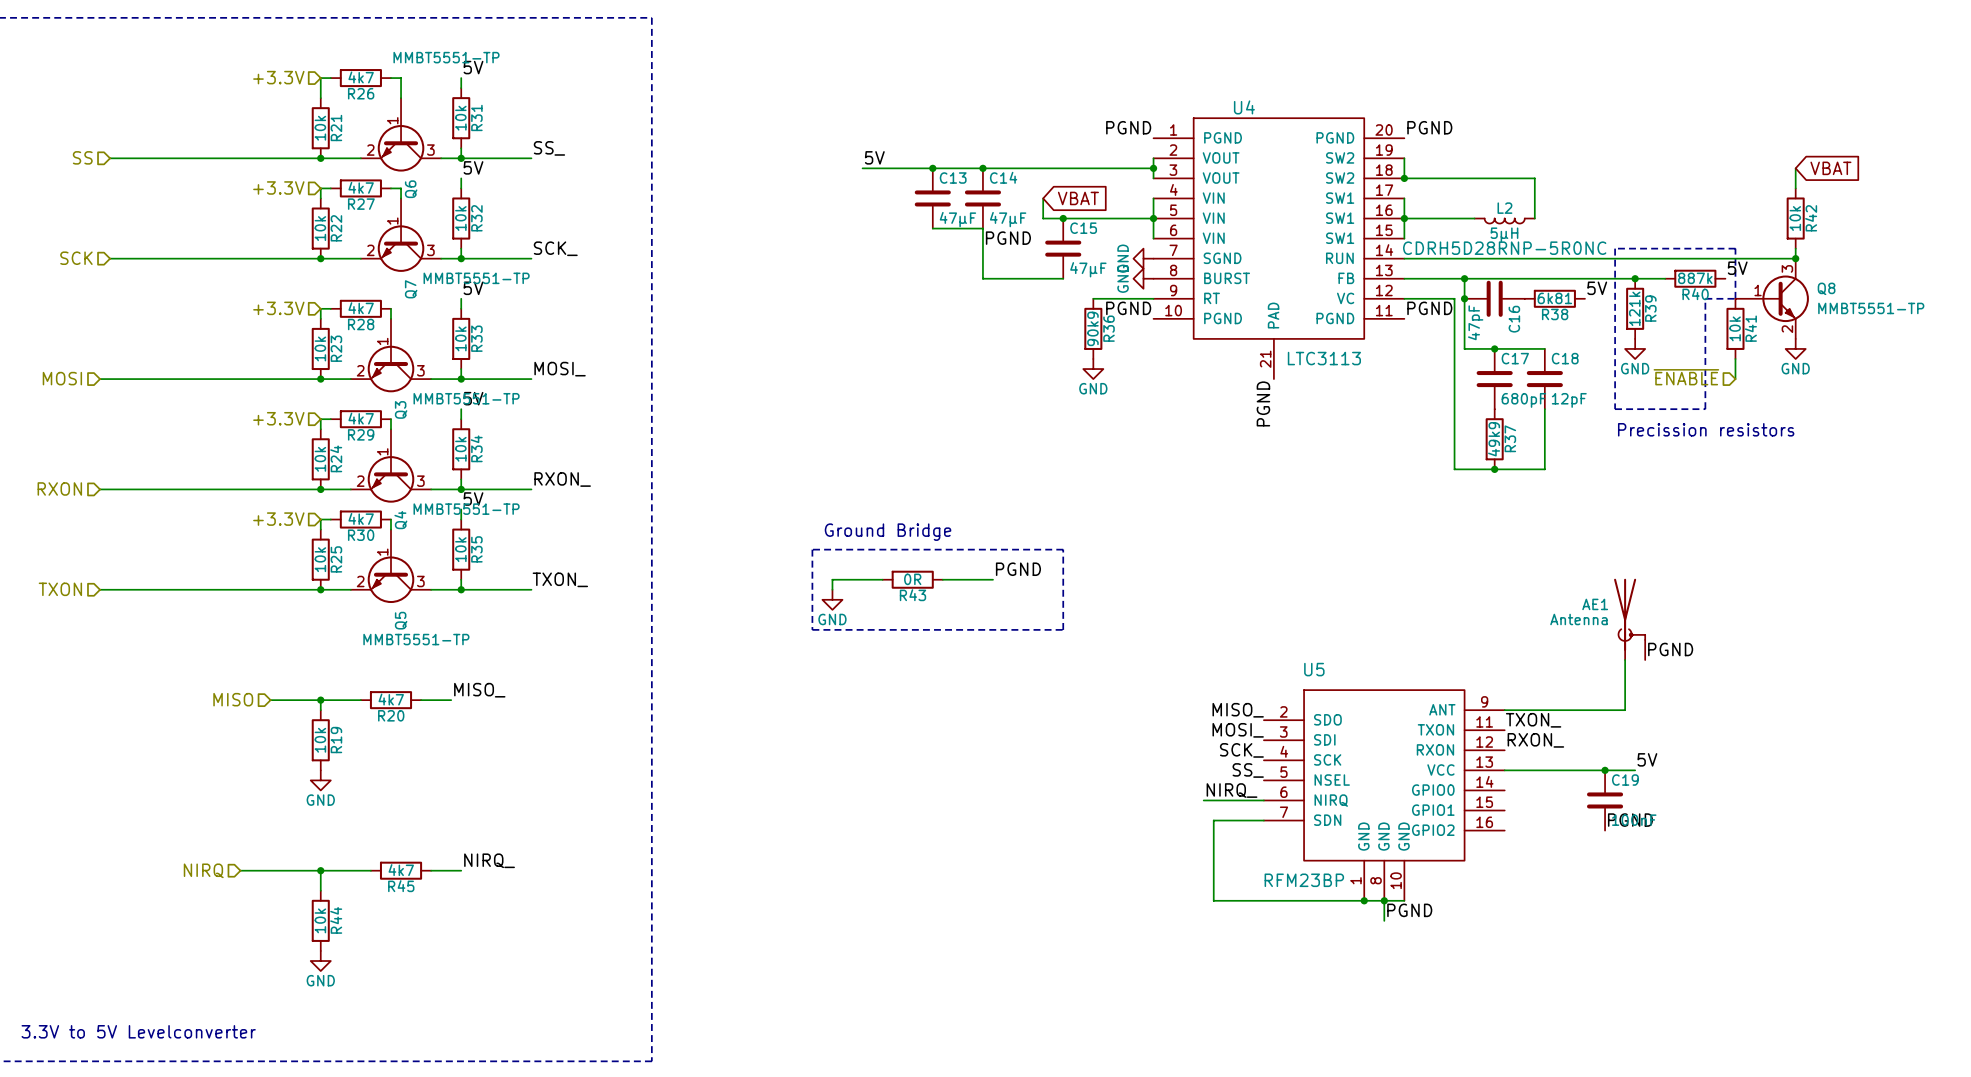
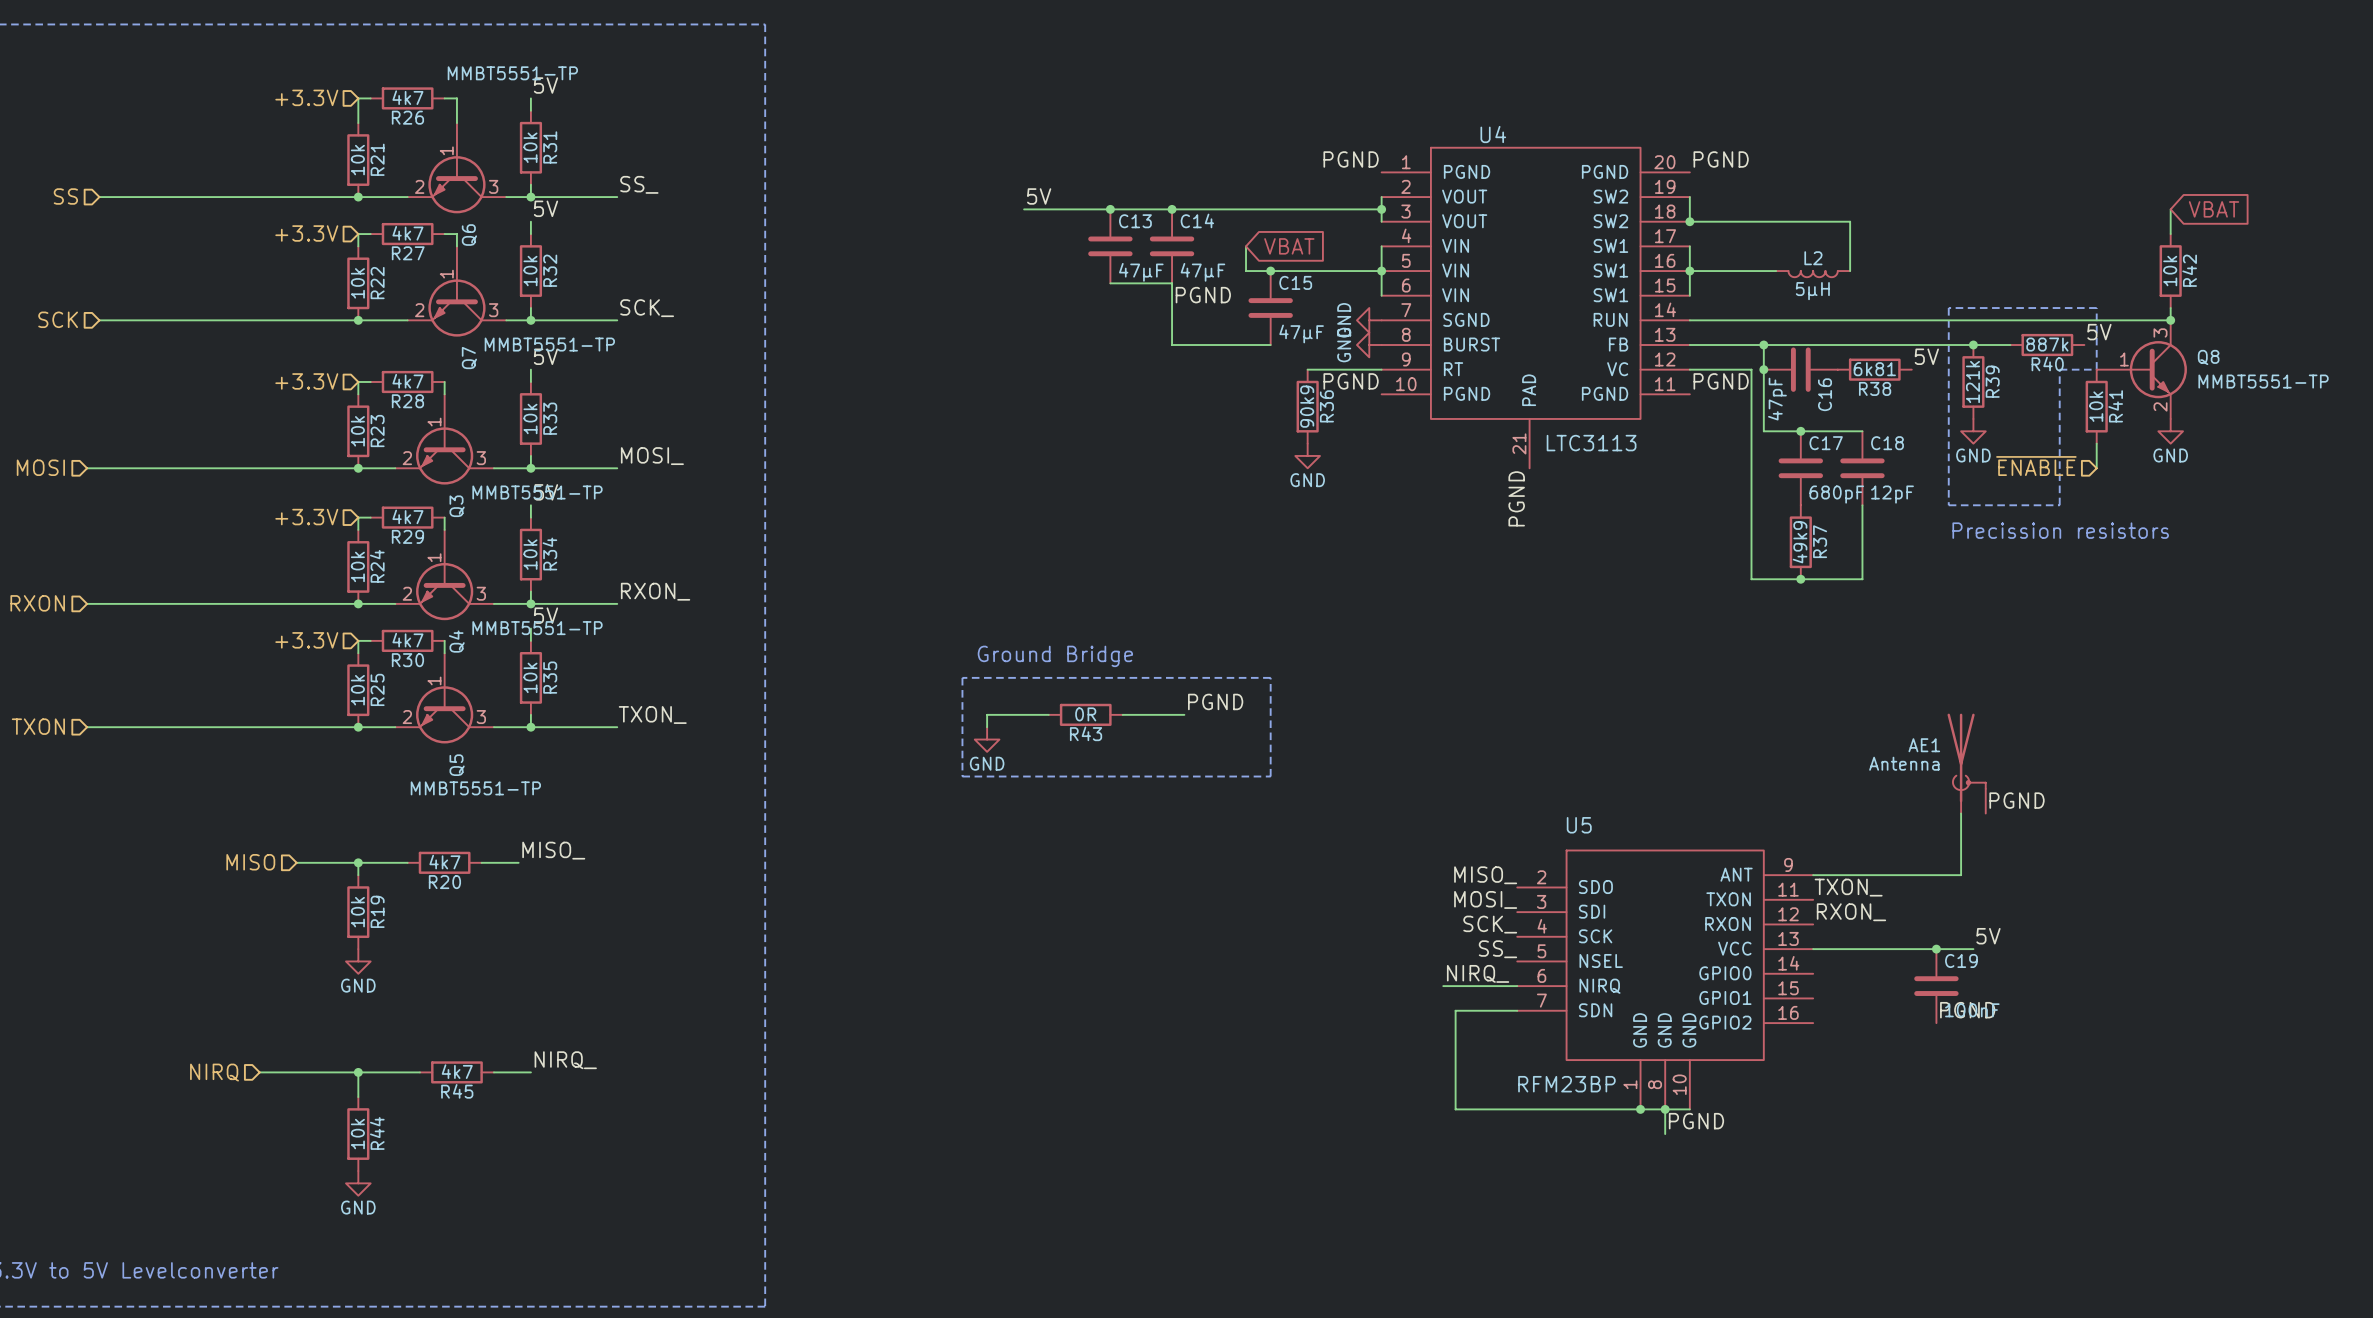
L2 text: CDRH5D28RNP-5R0NC (1504, 248) -> none

